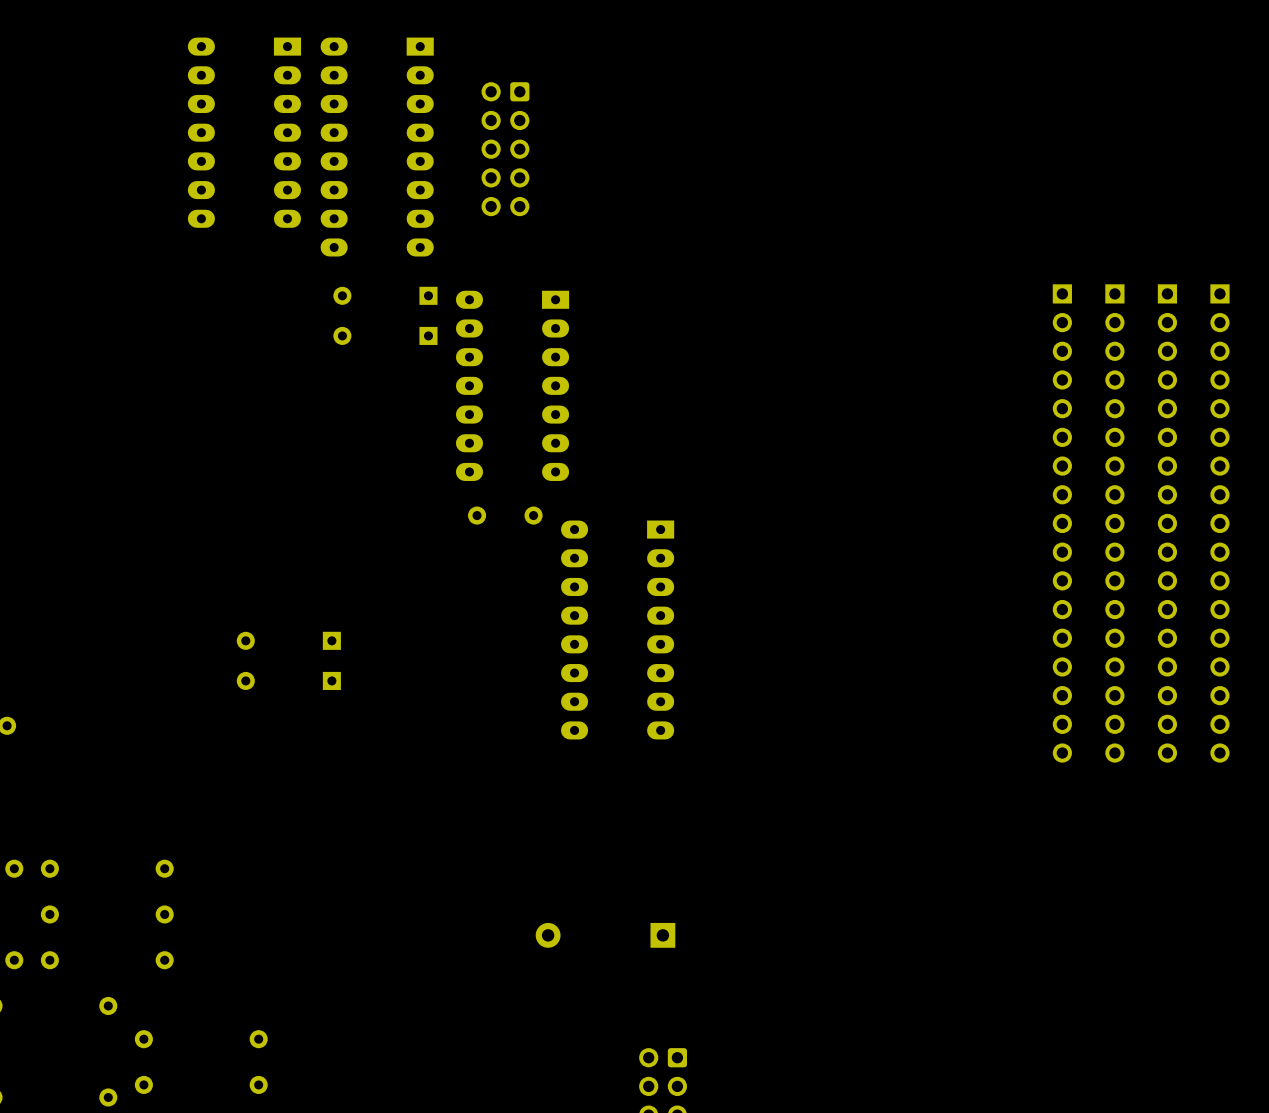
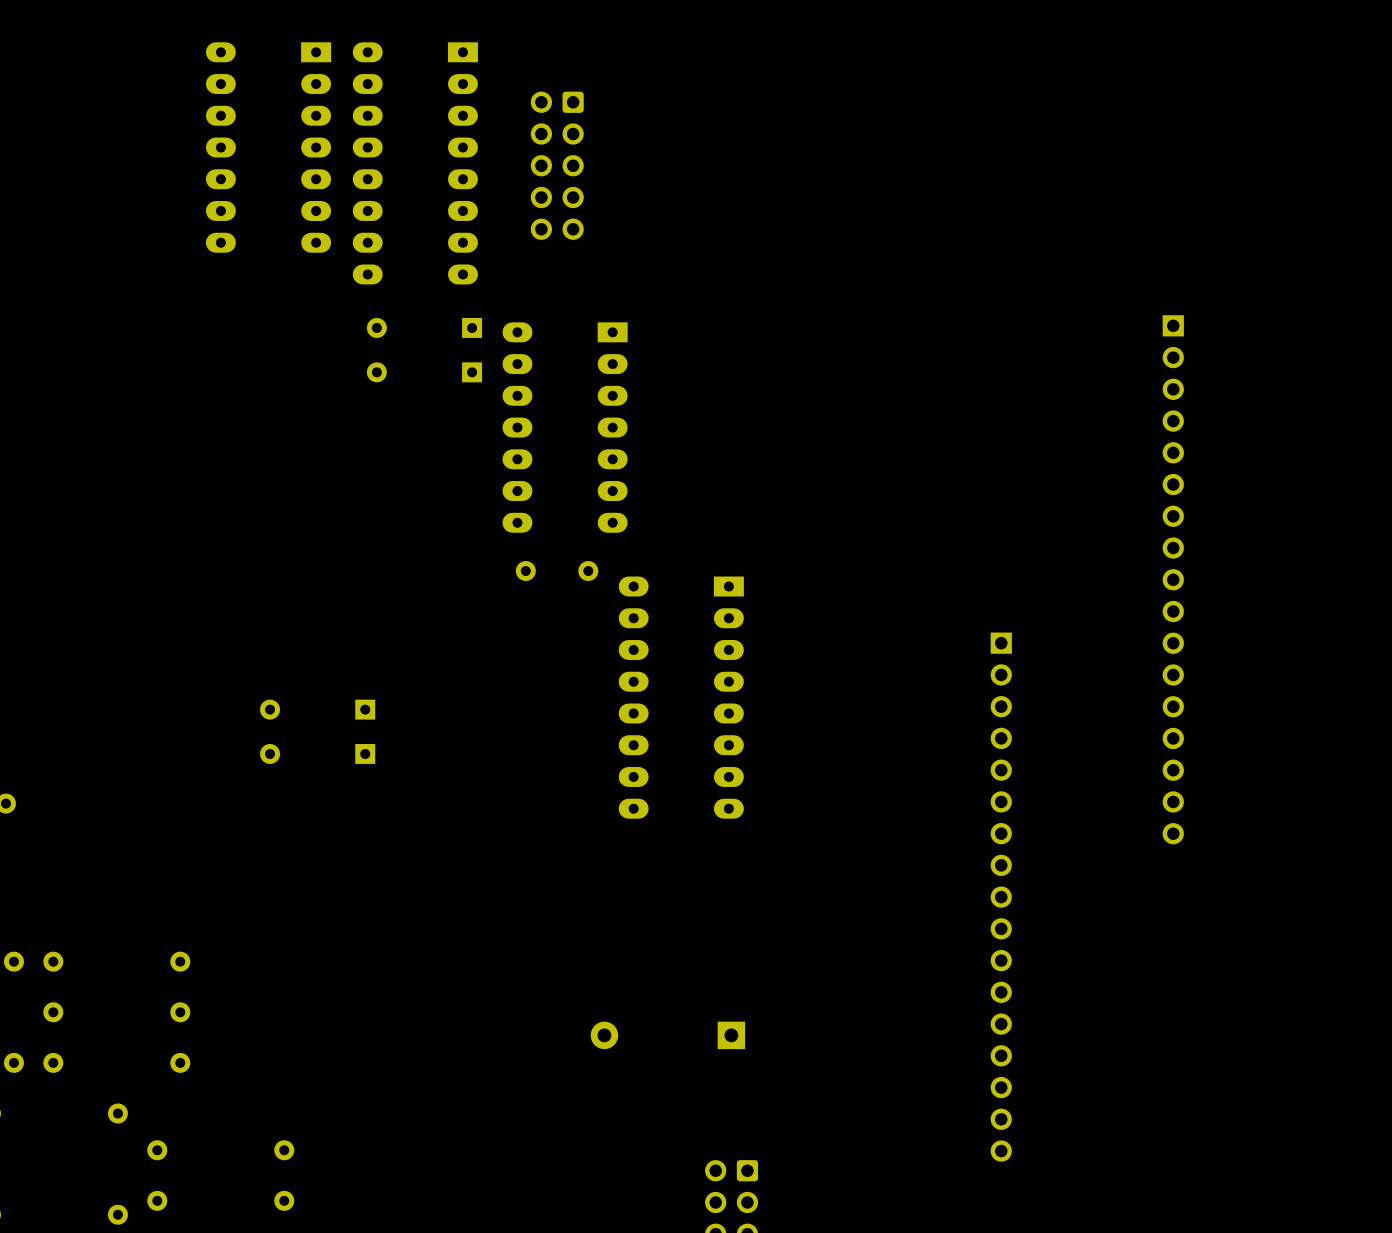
part: (1114, 523) -> none
part: (1167, 523) -> none
part: (1219, 523) -> none
part: none -> (1001, 897)

